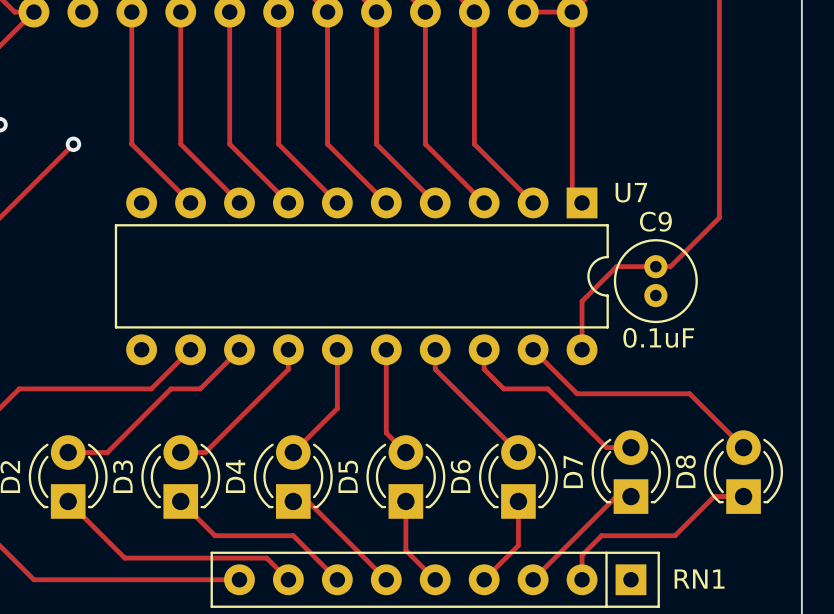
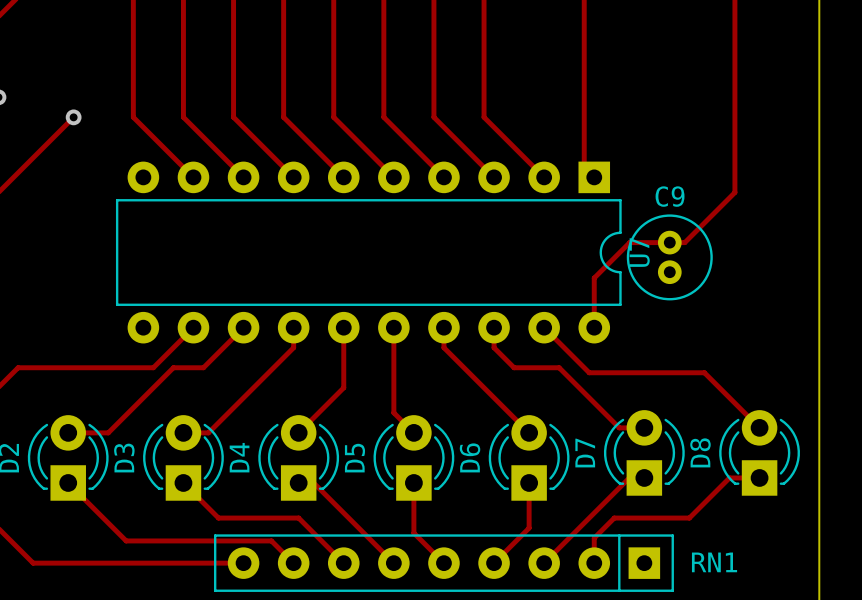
U7 name rotation: 0° (631, 192) -> 90° counterclockwise (639, 252)
U7 name position: U7 (631, 192) -> U7 (639, 252)
text: 0.1uF (658, 337) -> none

